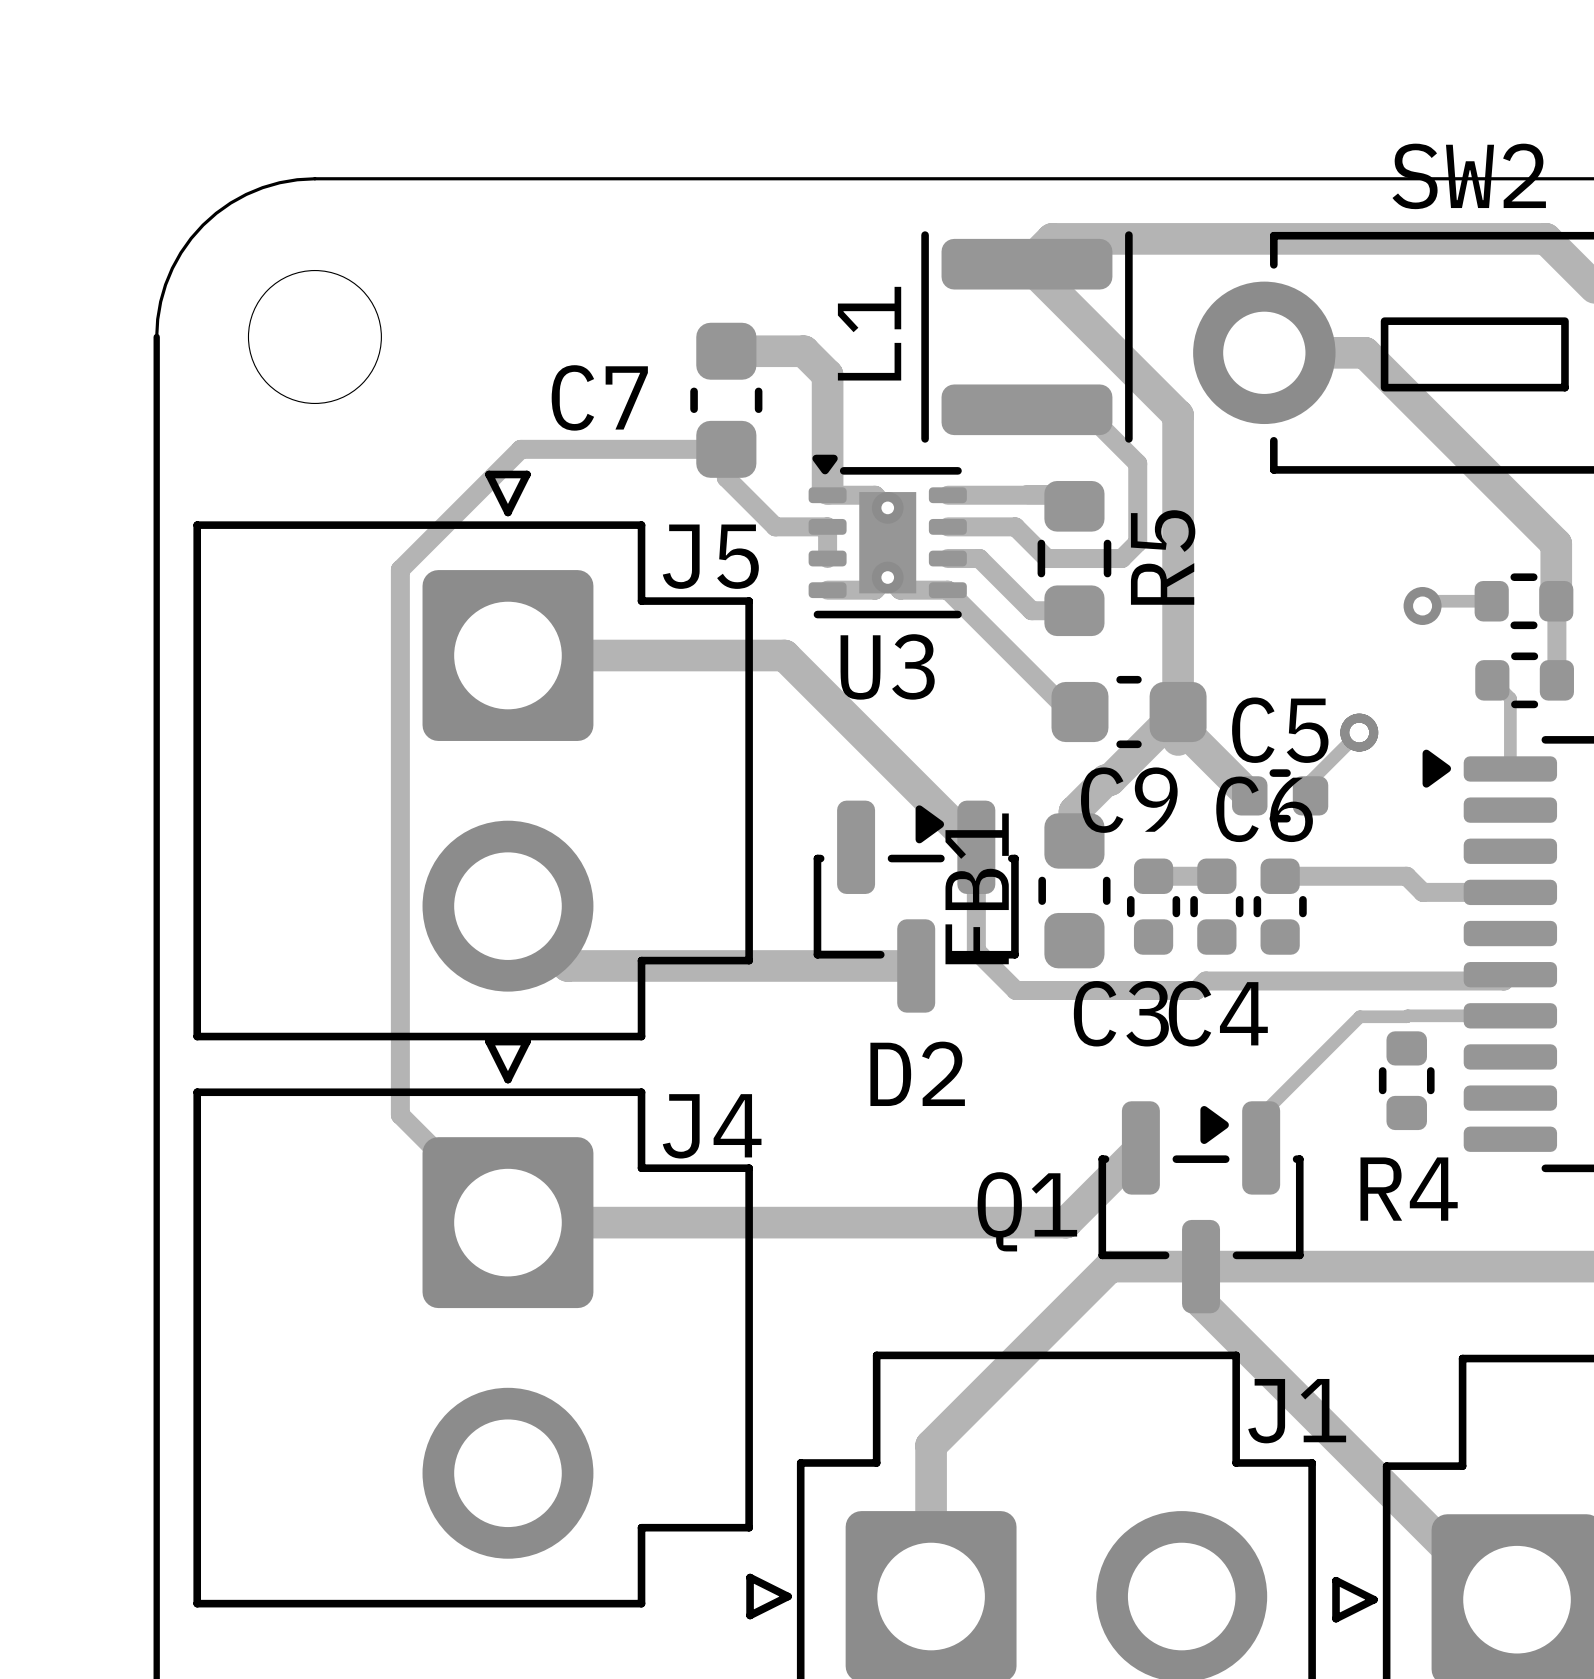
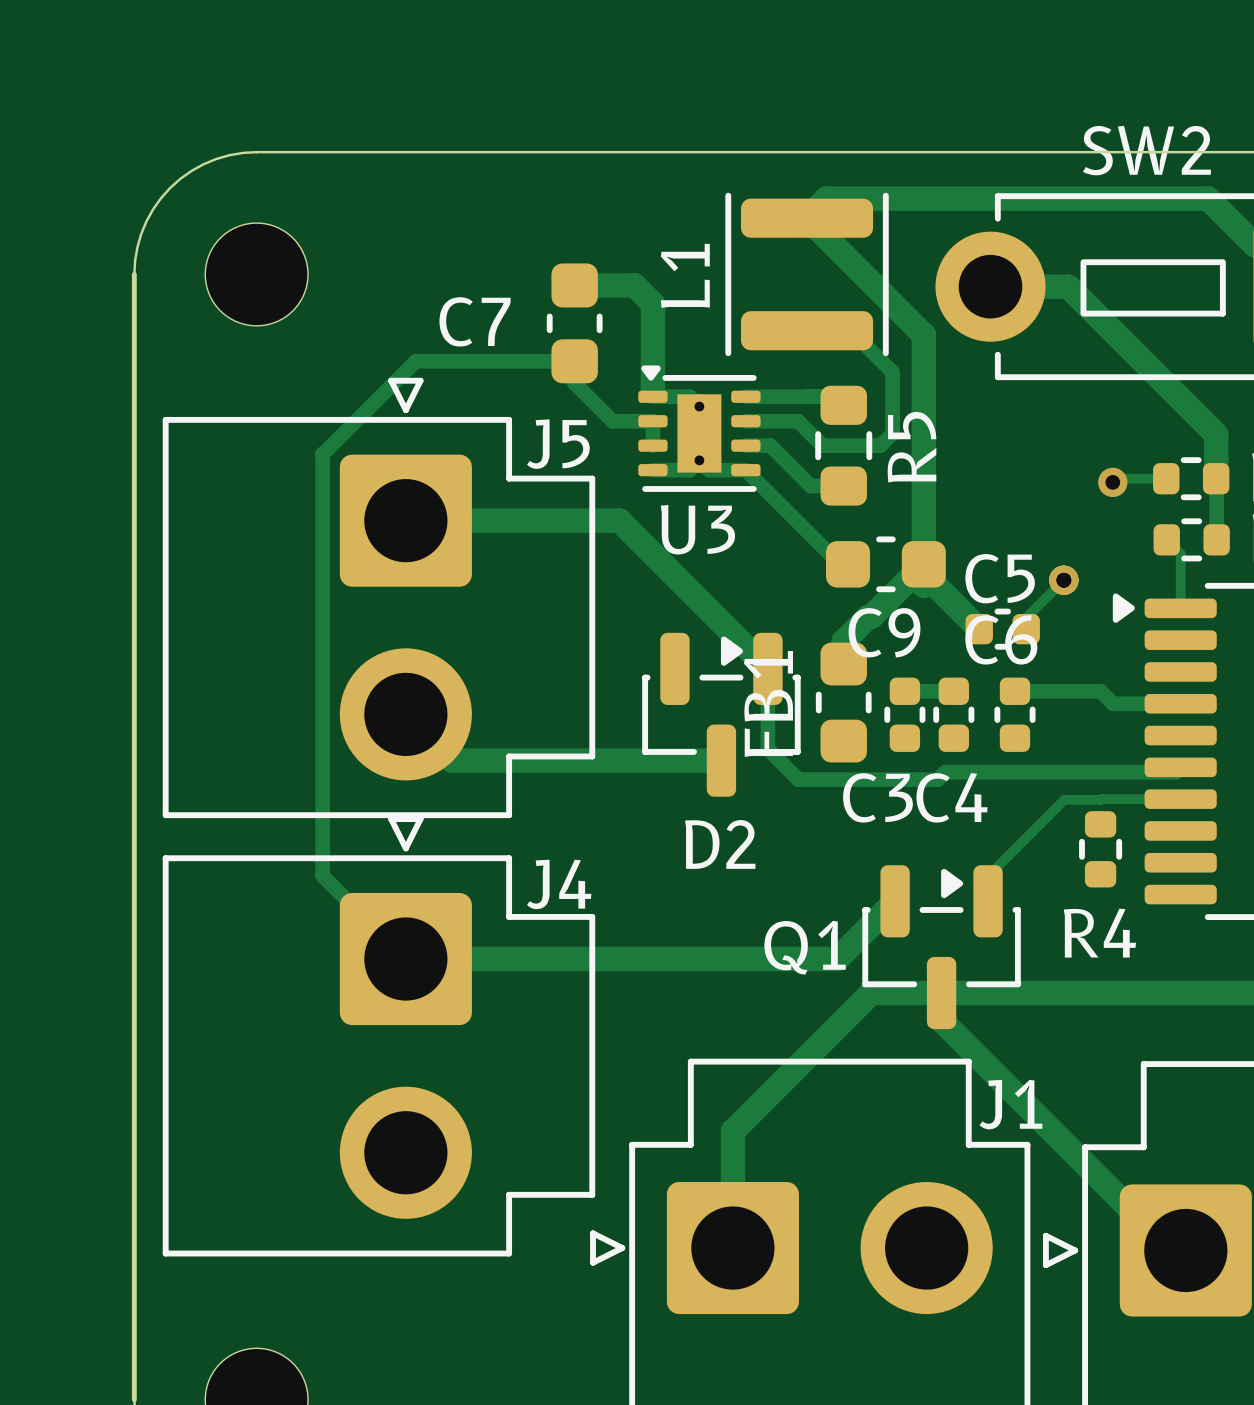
C6 position: (1280, 906) -> (1014, 714)

